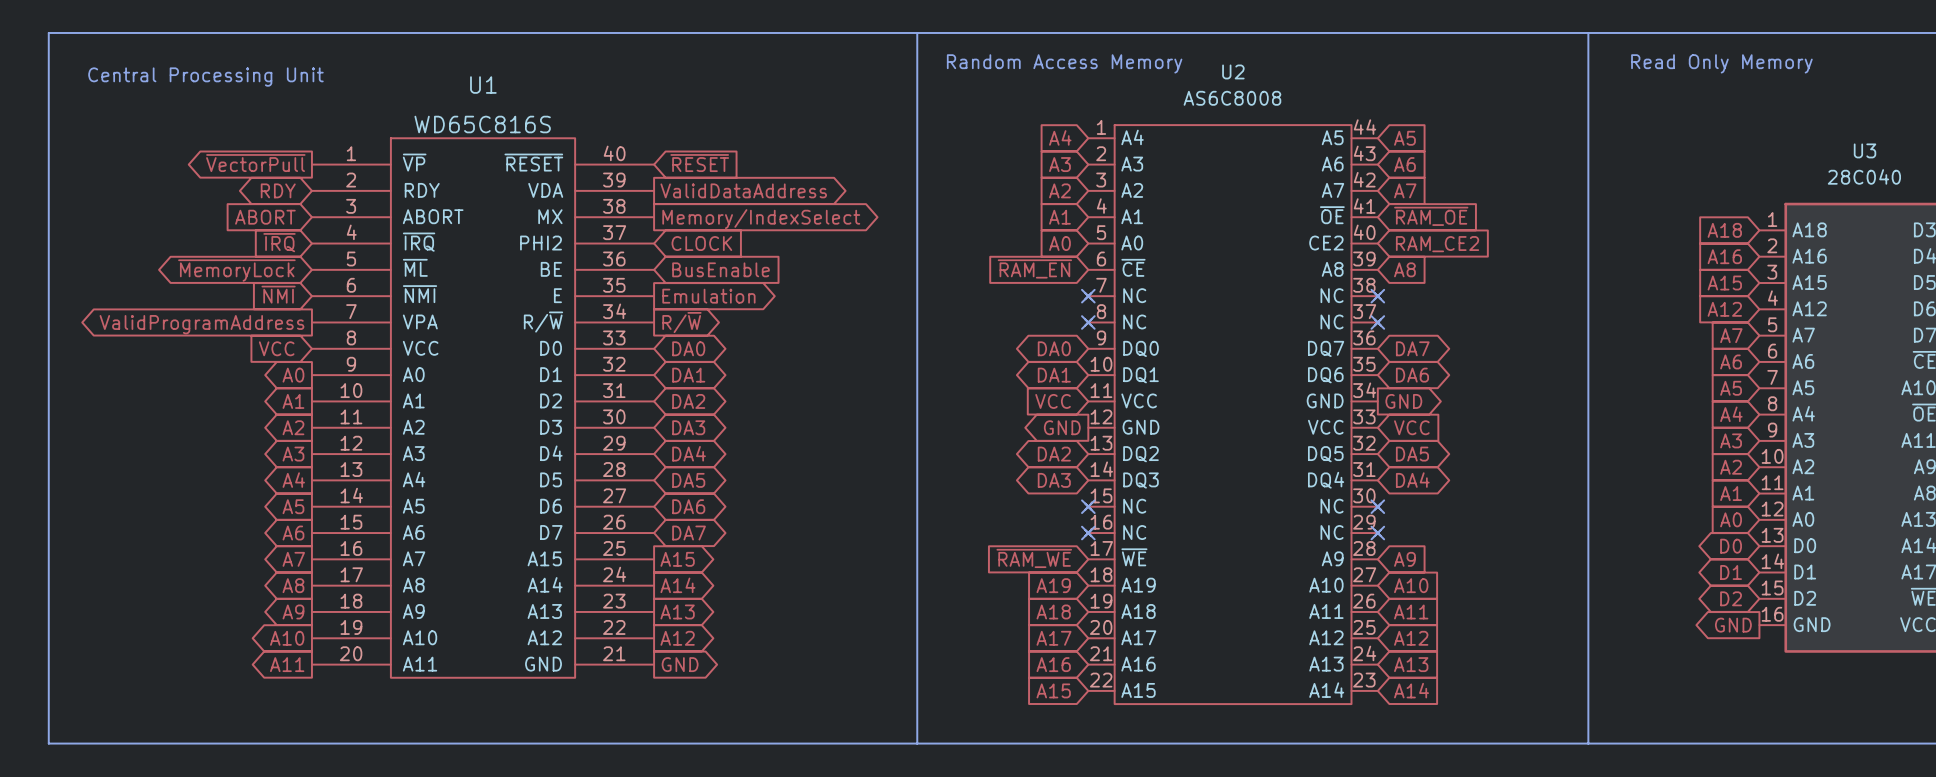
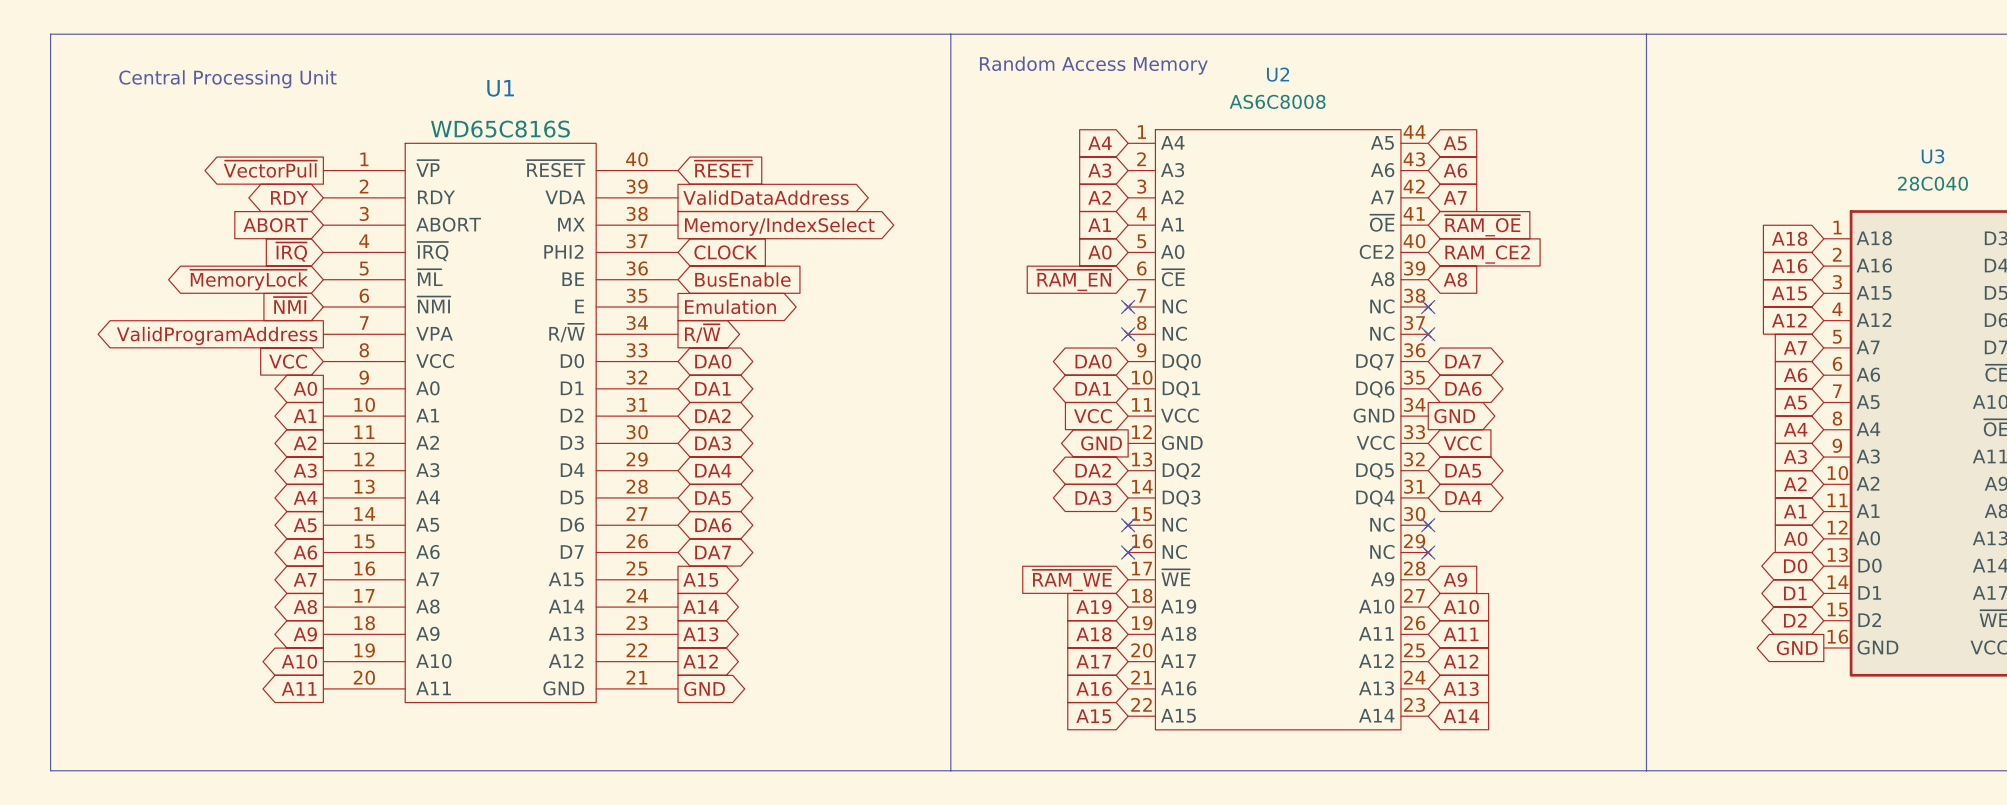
text: Read Only Memory (1721, 63) -> none

